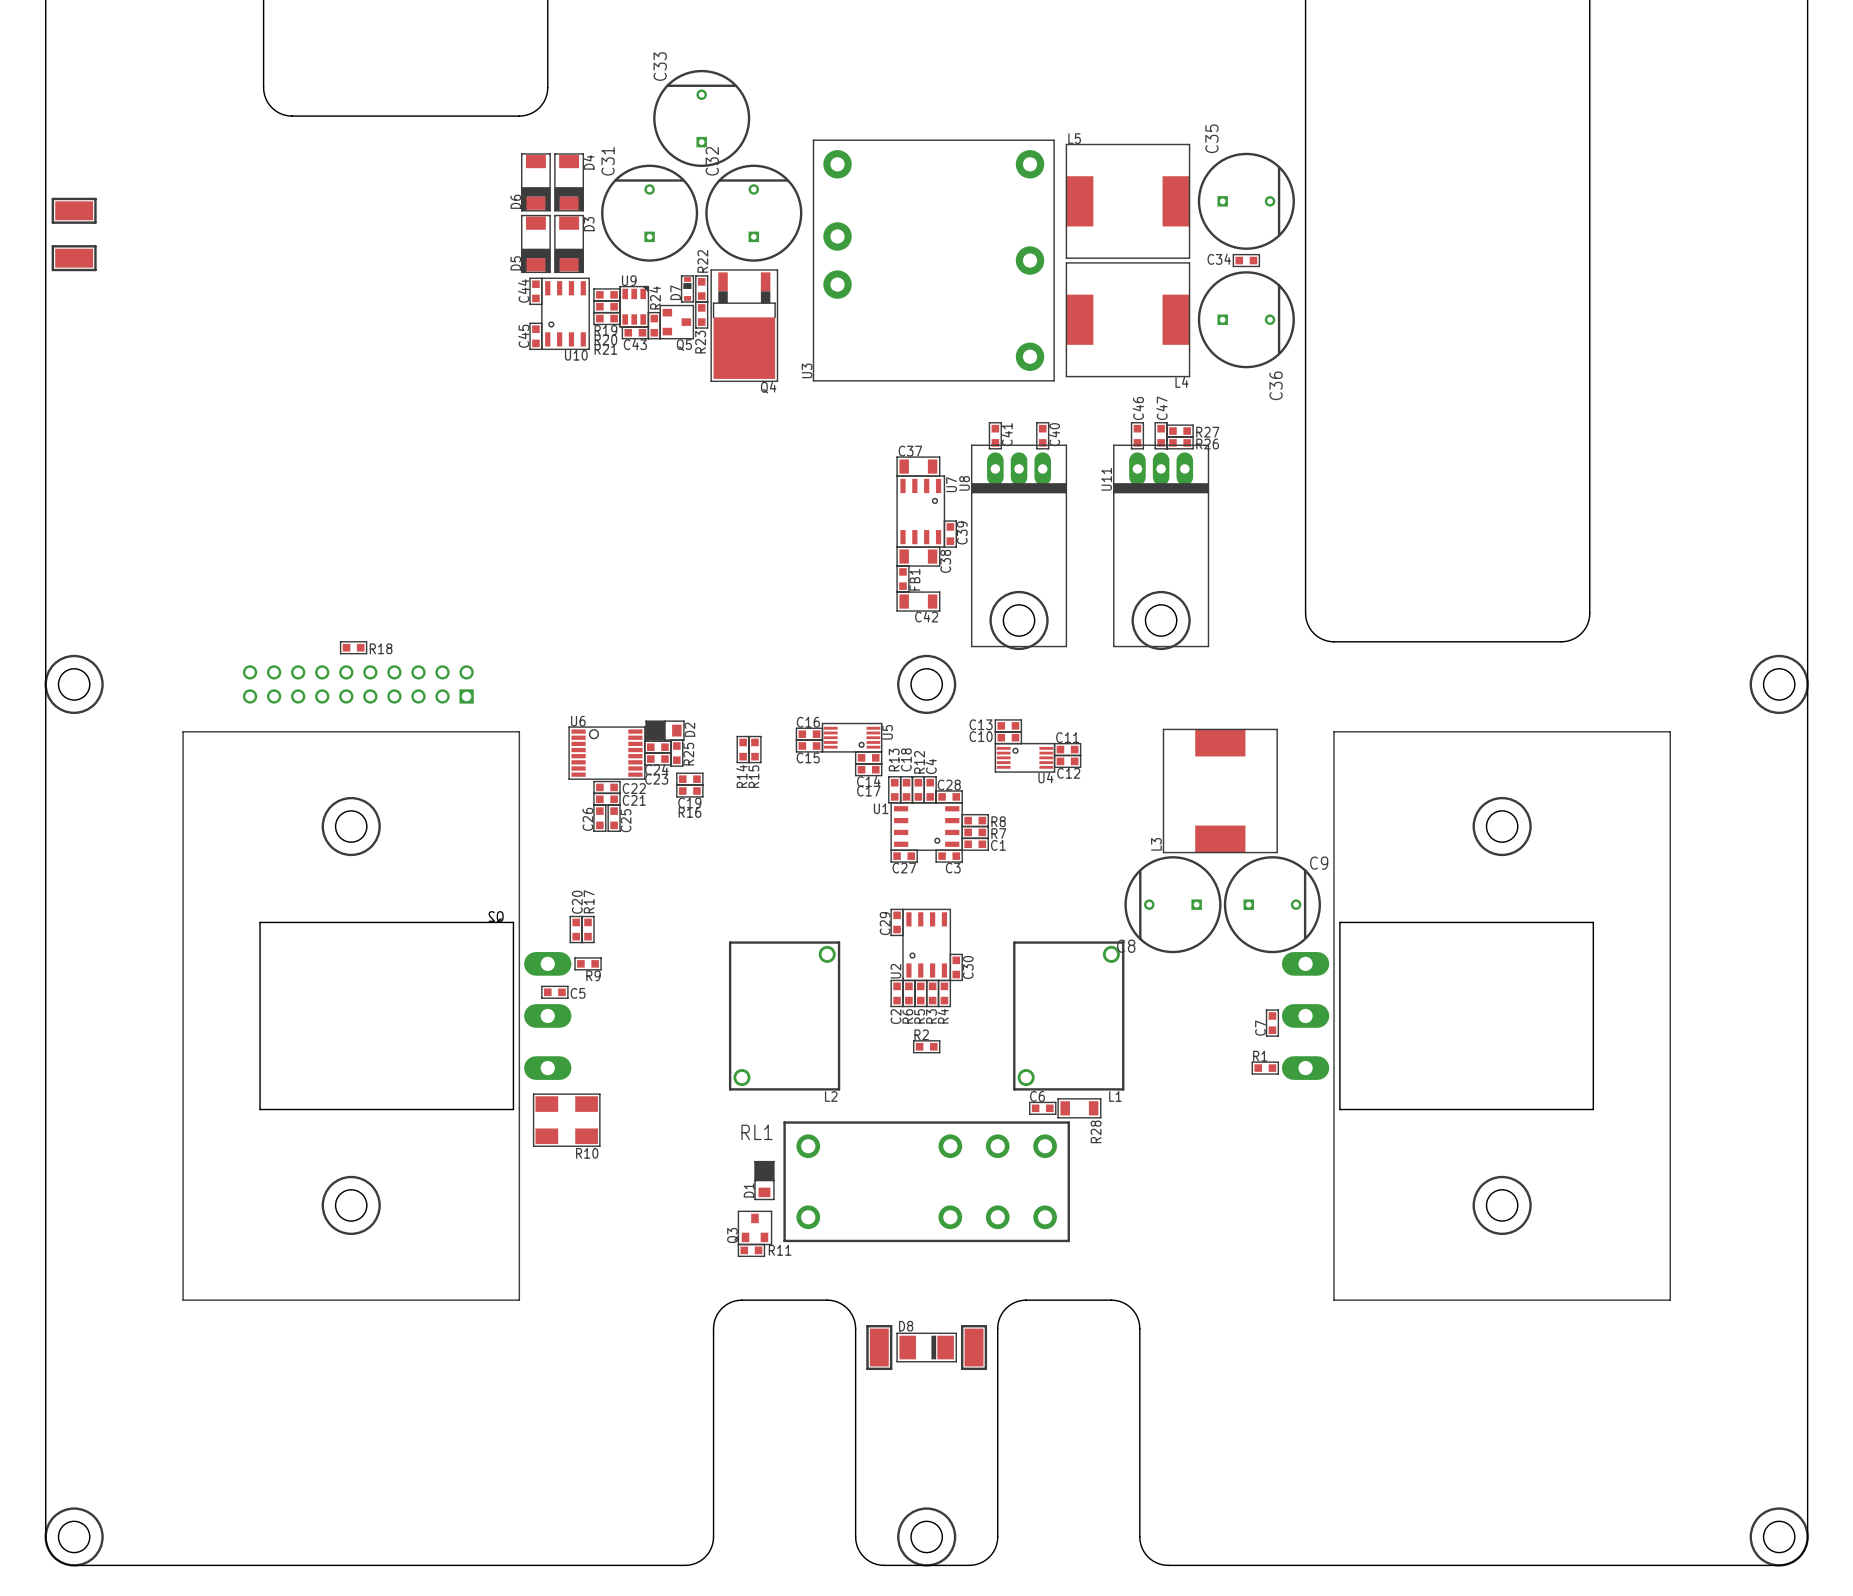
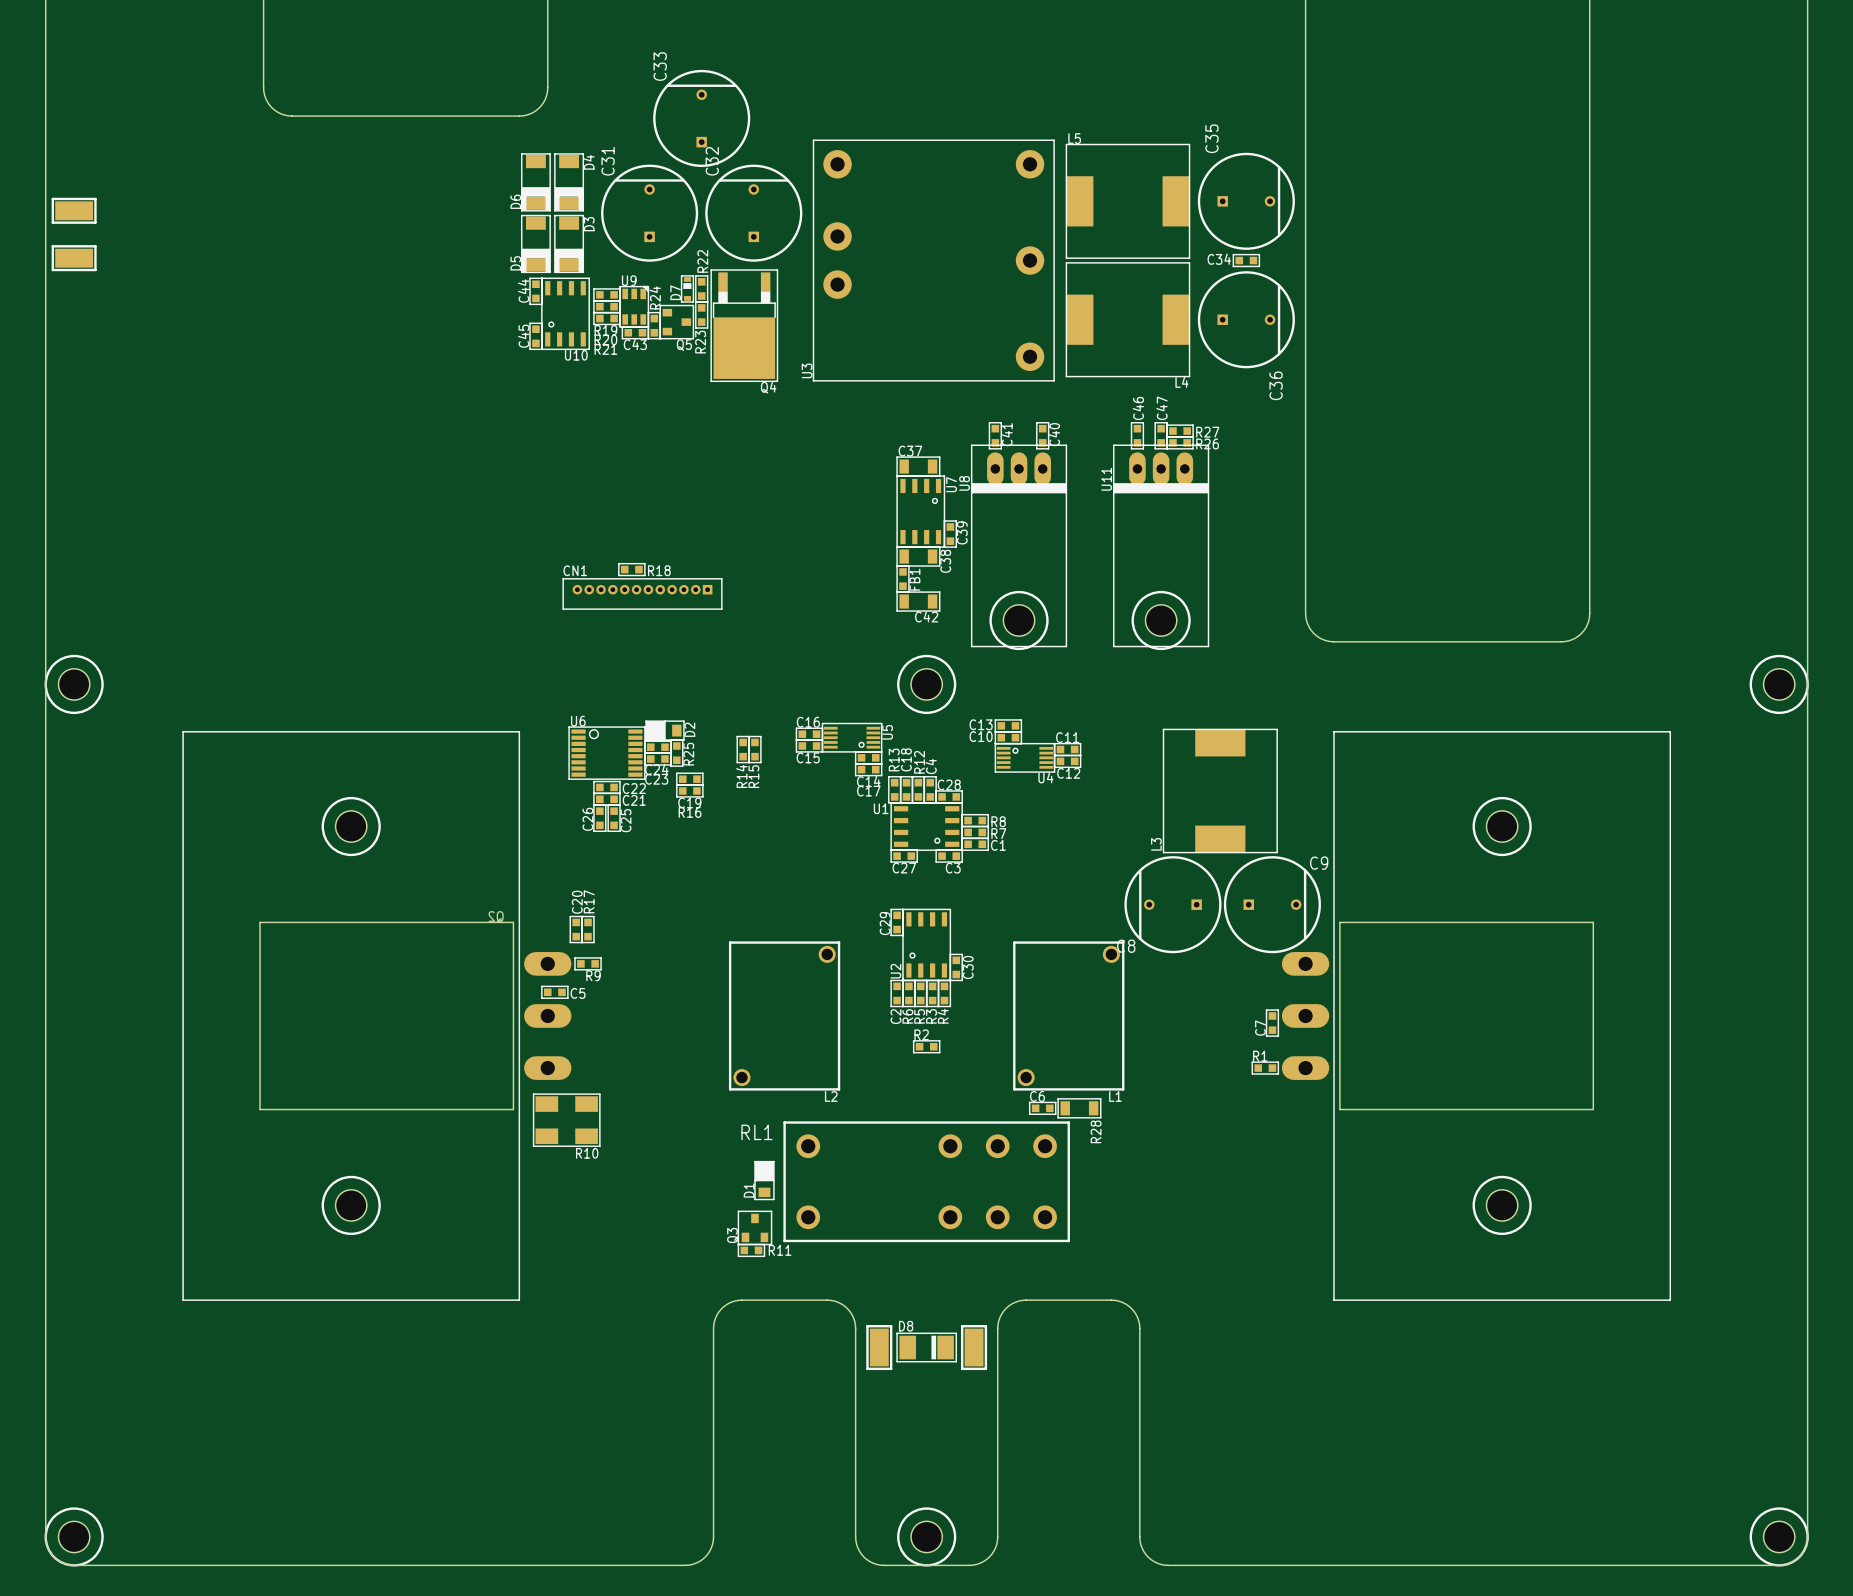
CN1: none -> (642, 593)
R18 position: (353, 647) -> (631, 569)
part: (358, 684) -> none

